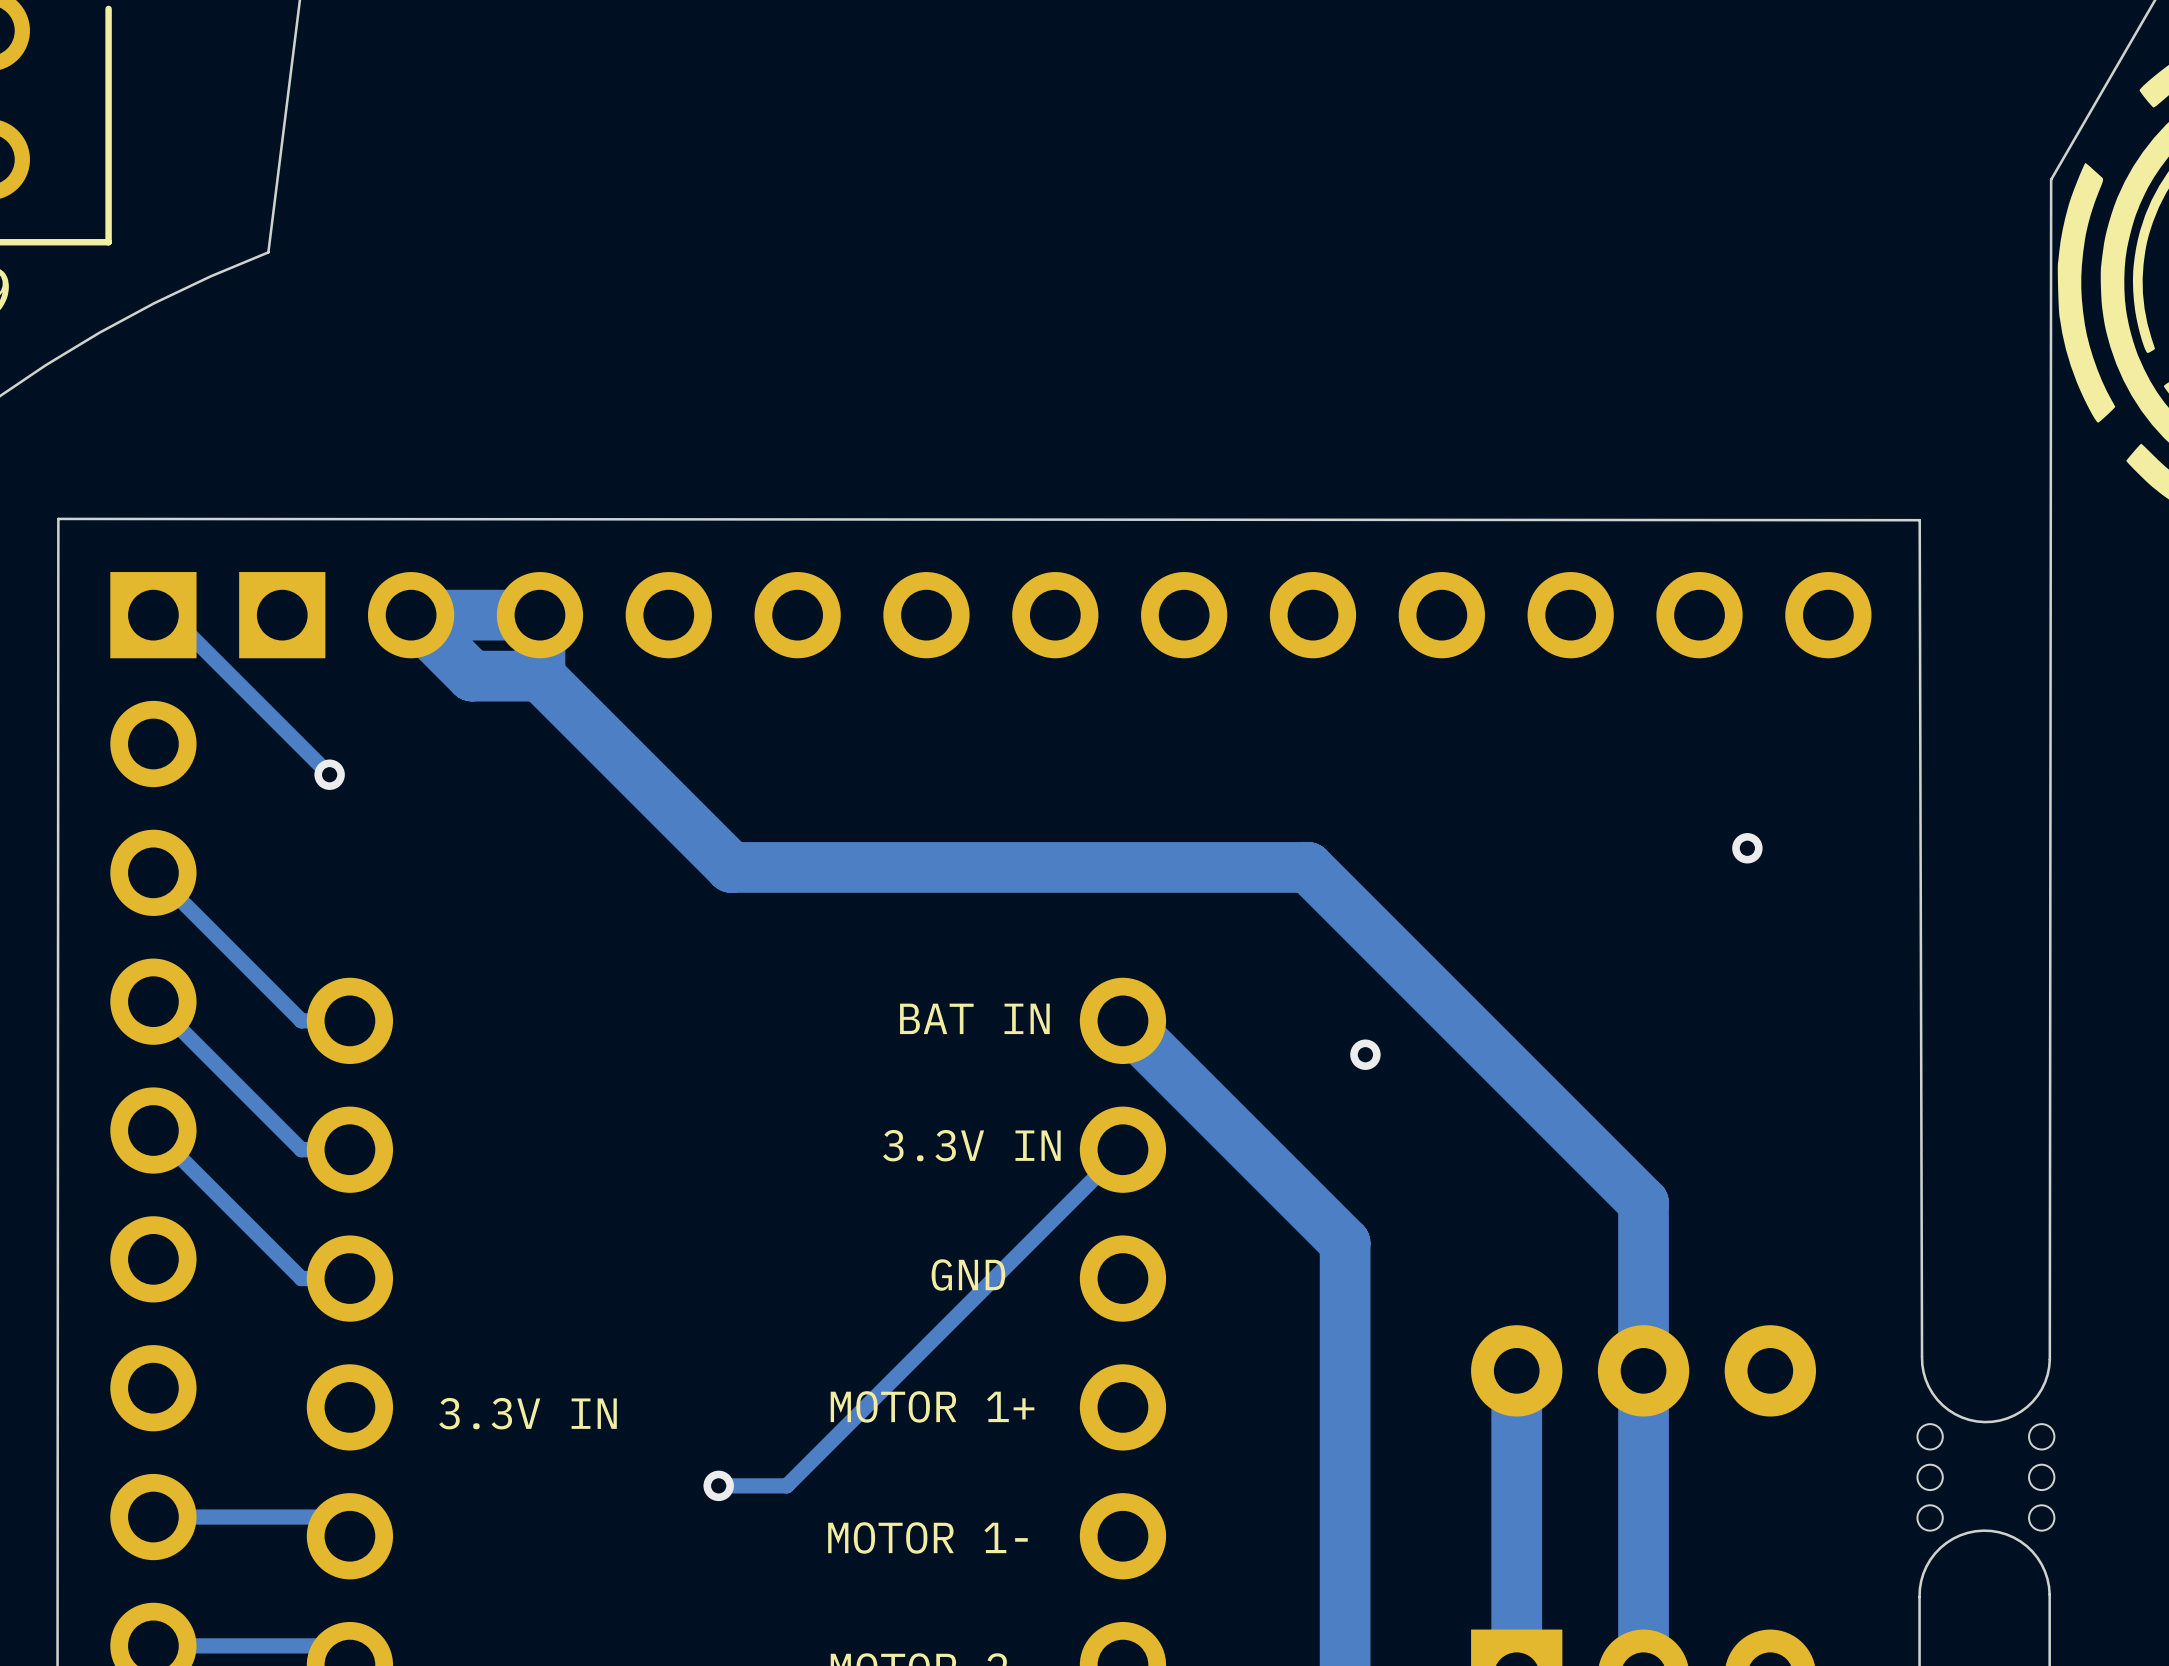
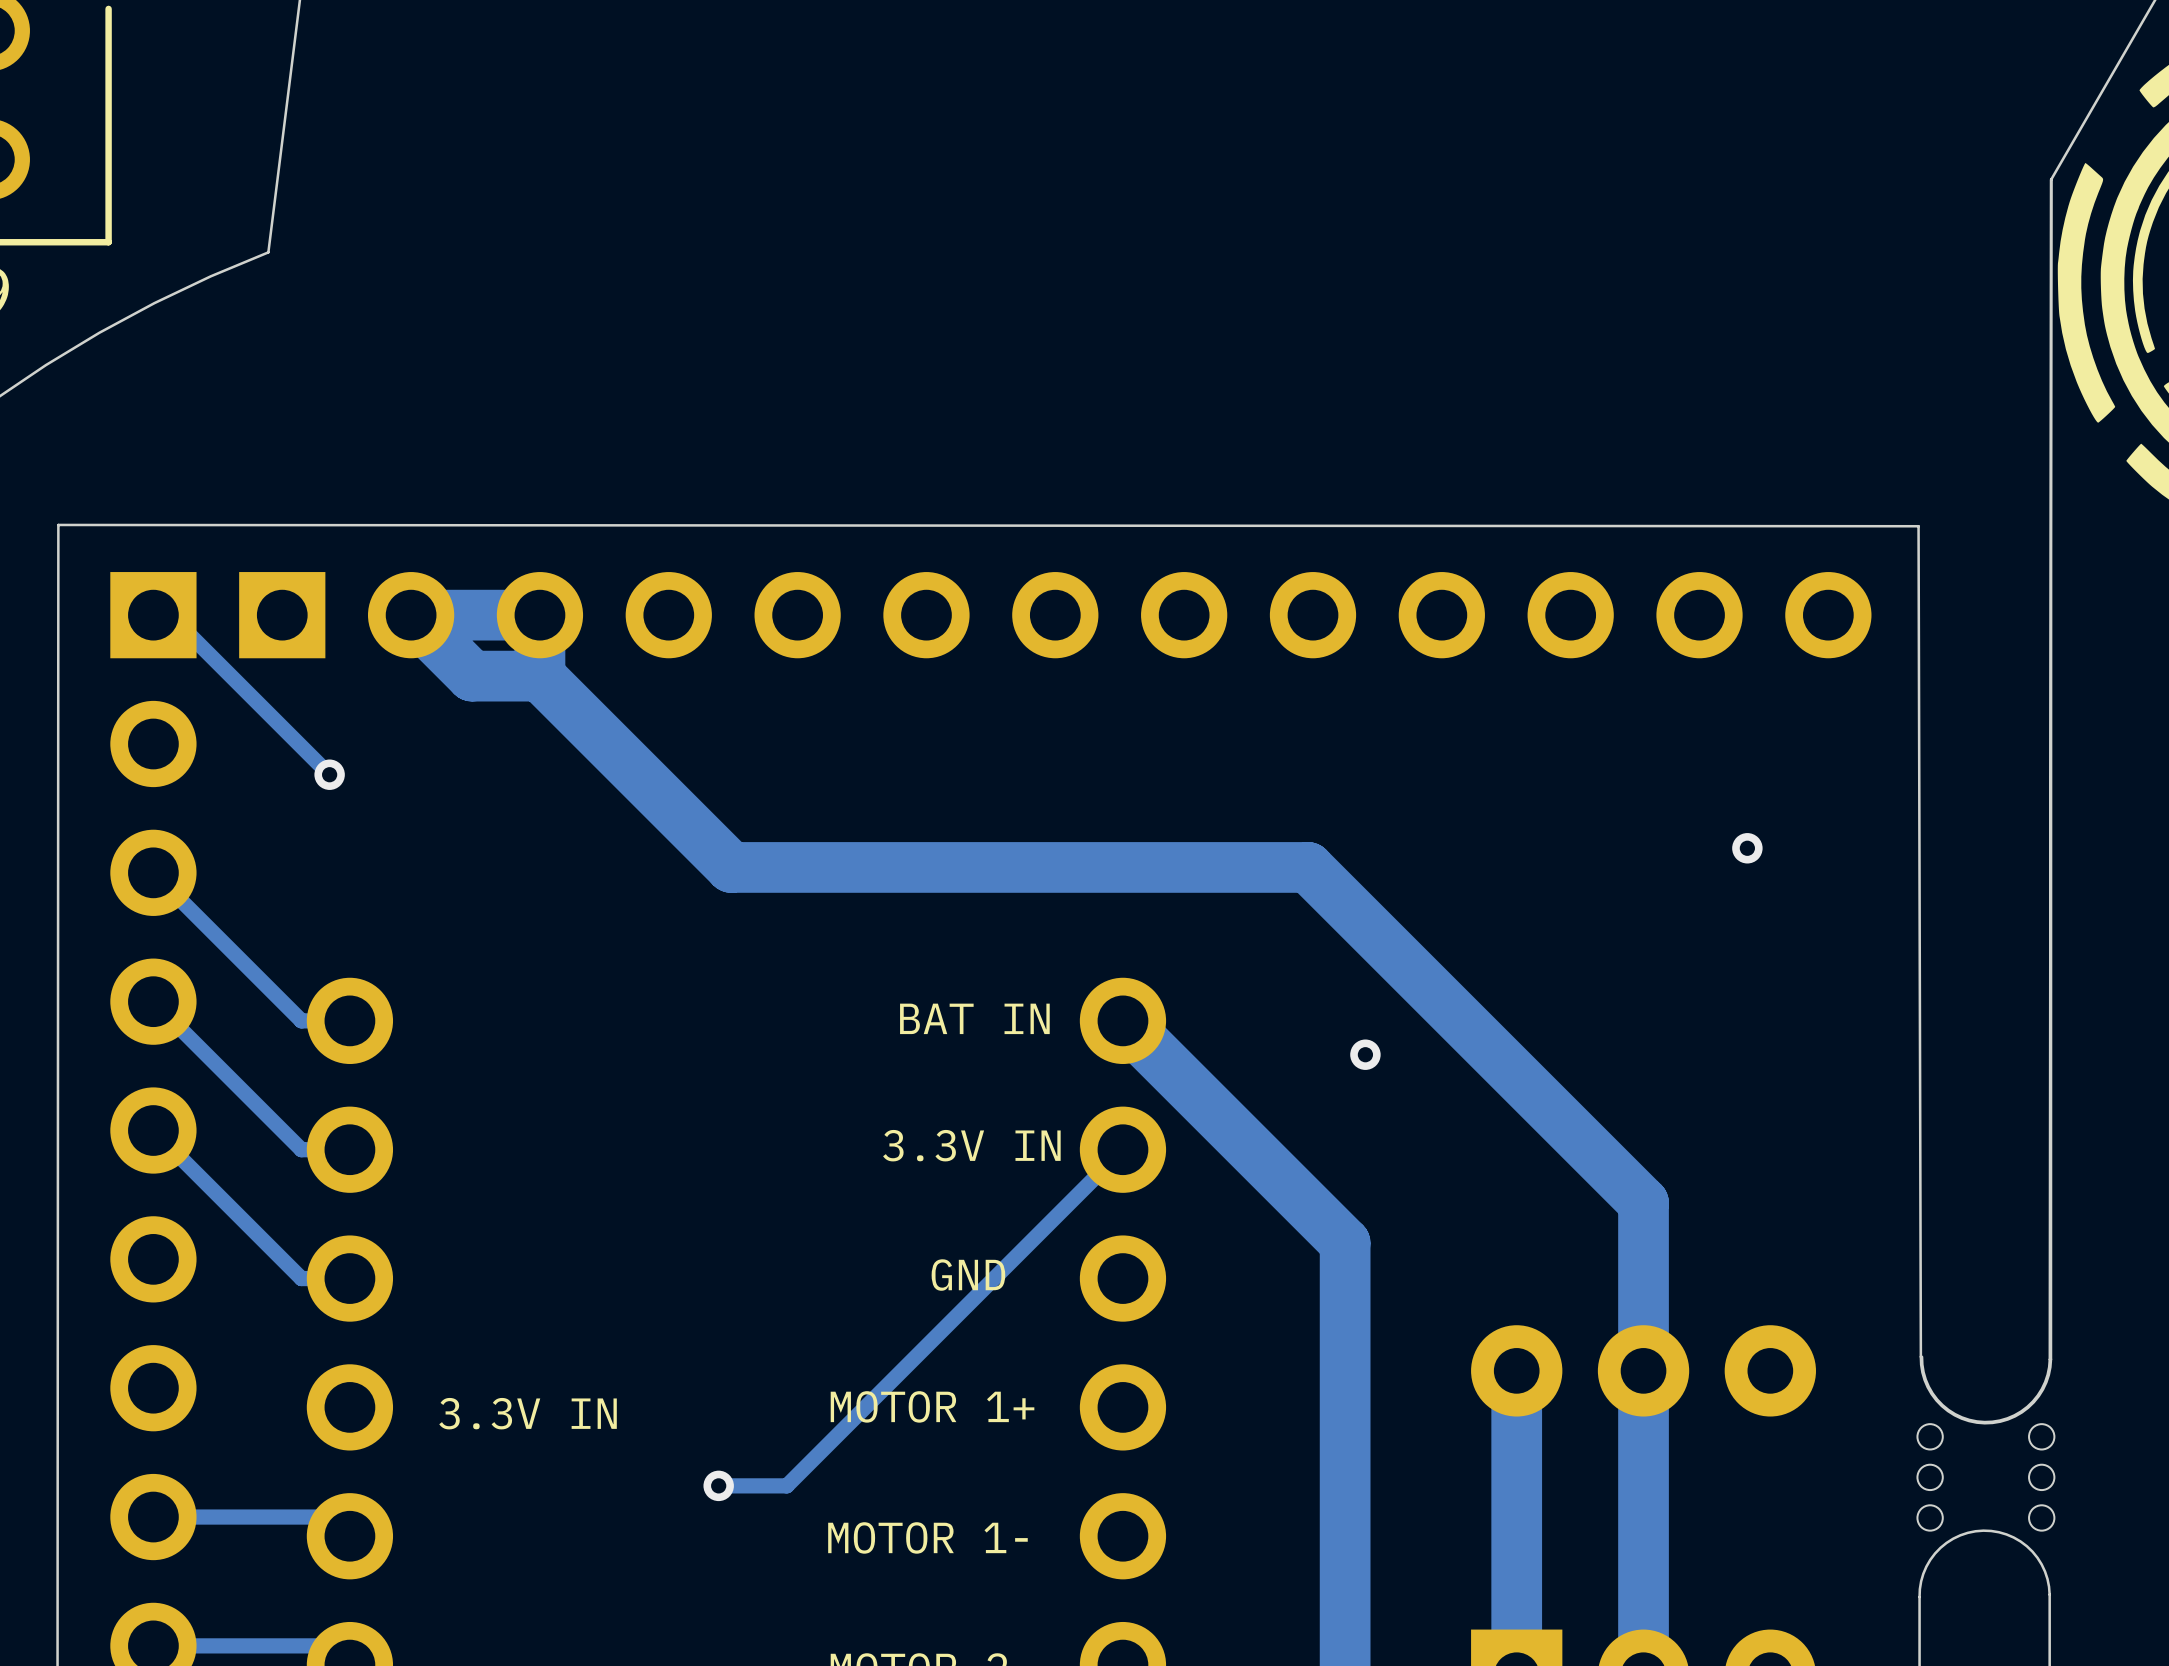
board edge: (58, 524) (58, 518) (1919, 520) (1922, 1356) -> (58, 524) (1918, 526) (1921, 1364) (1927, 1387) (1936, 1400) (1947, 1411) (1961, 1418) (1976, 1422) (2000, 1421) (2021, 1412) (2038, 1396) (2048, 1374) (2050, 1359) (2051, 179)

